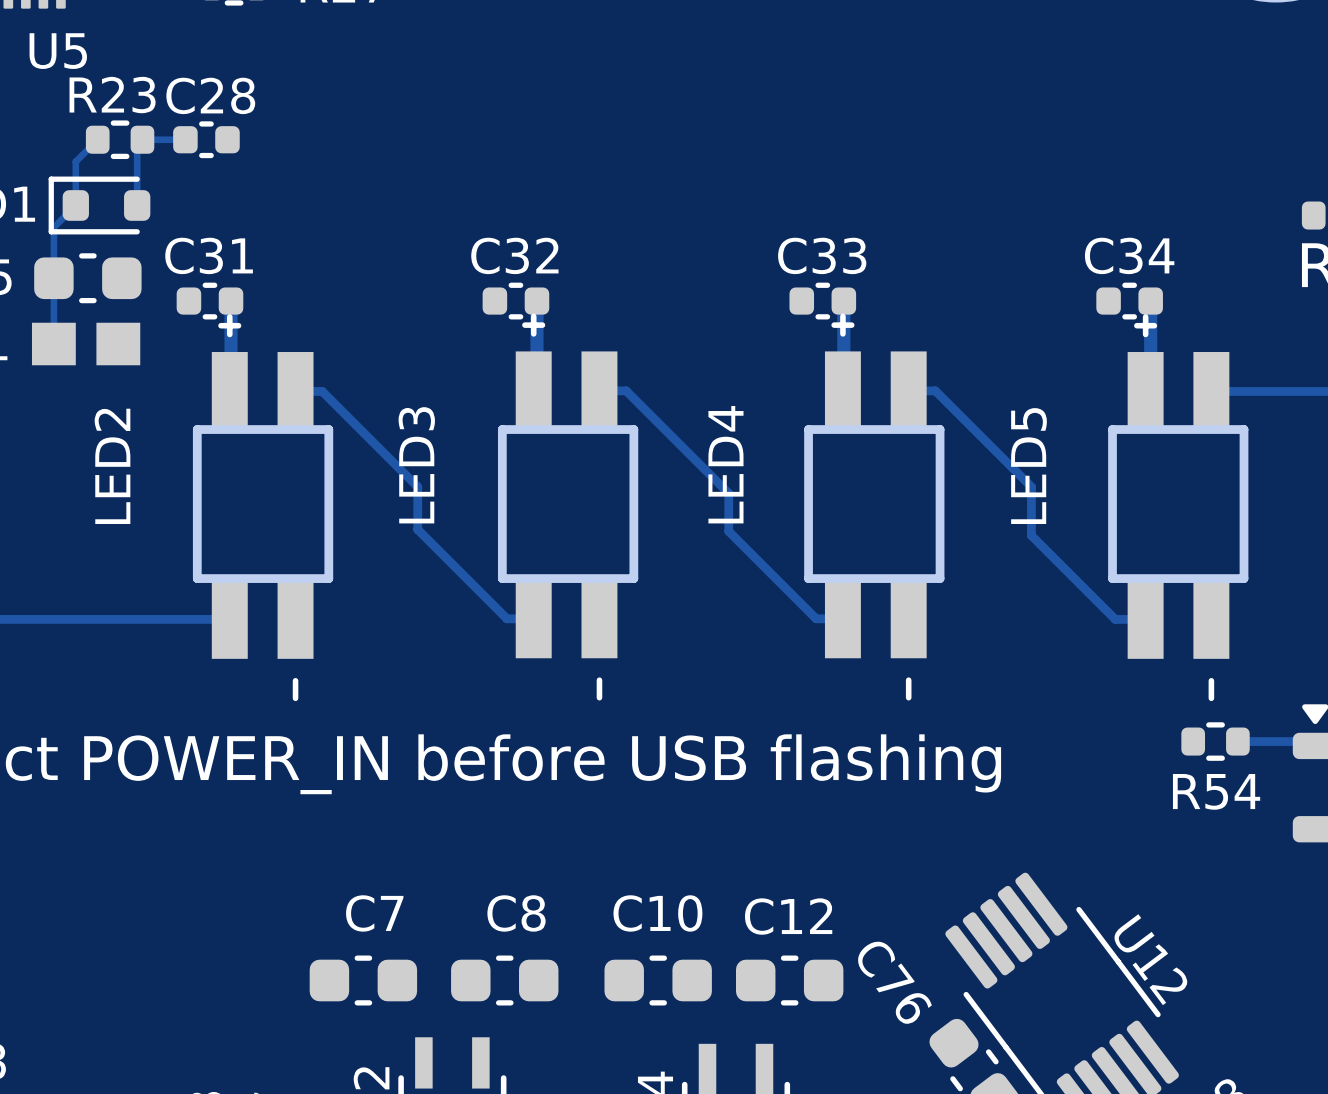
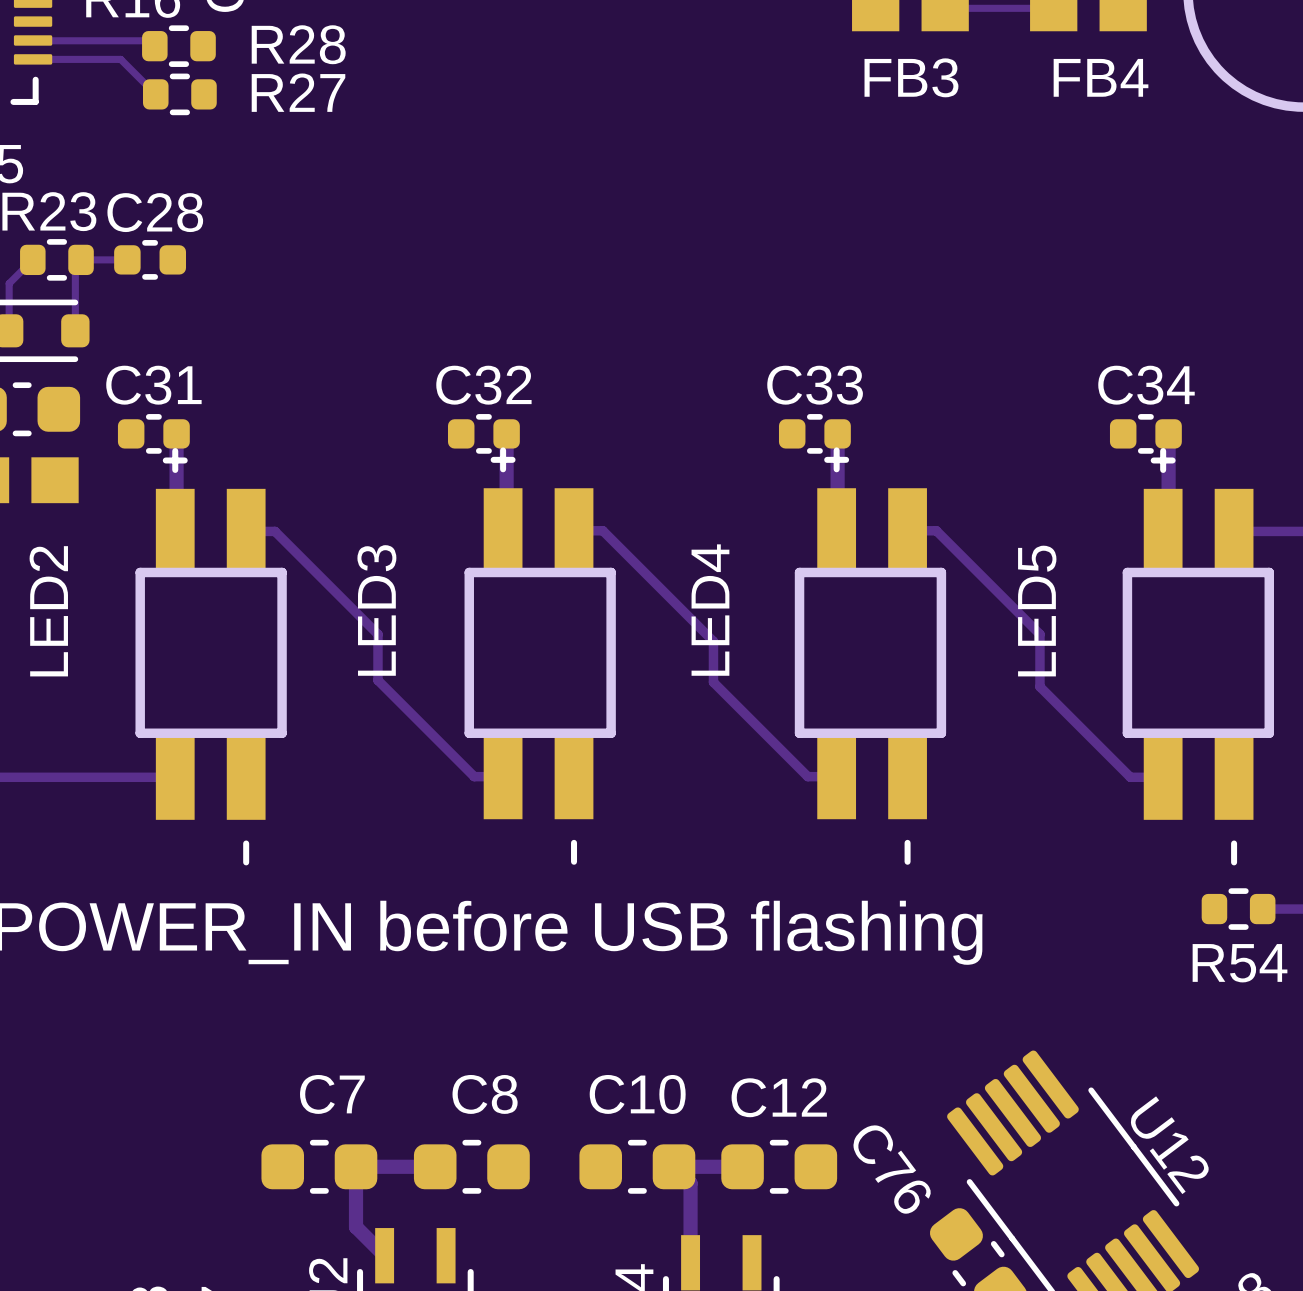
track: none -> (435, 1166) (356, 1166) (356, 1227) (384, 1255)
track: none -> (742, 1166) (674, 1166) (690, 1183) (690, 1262)

